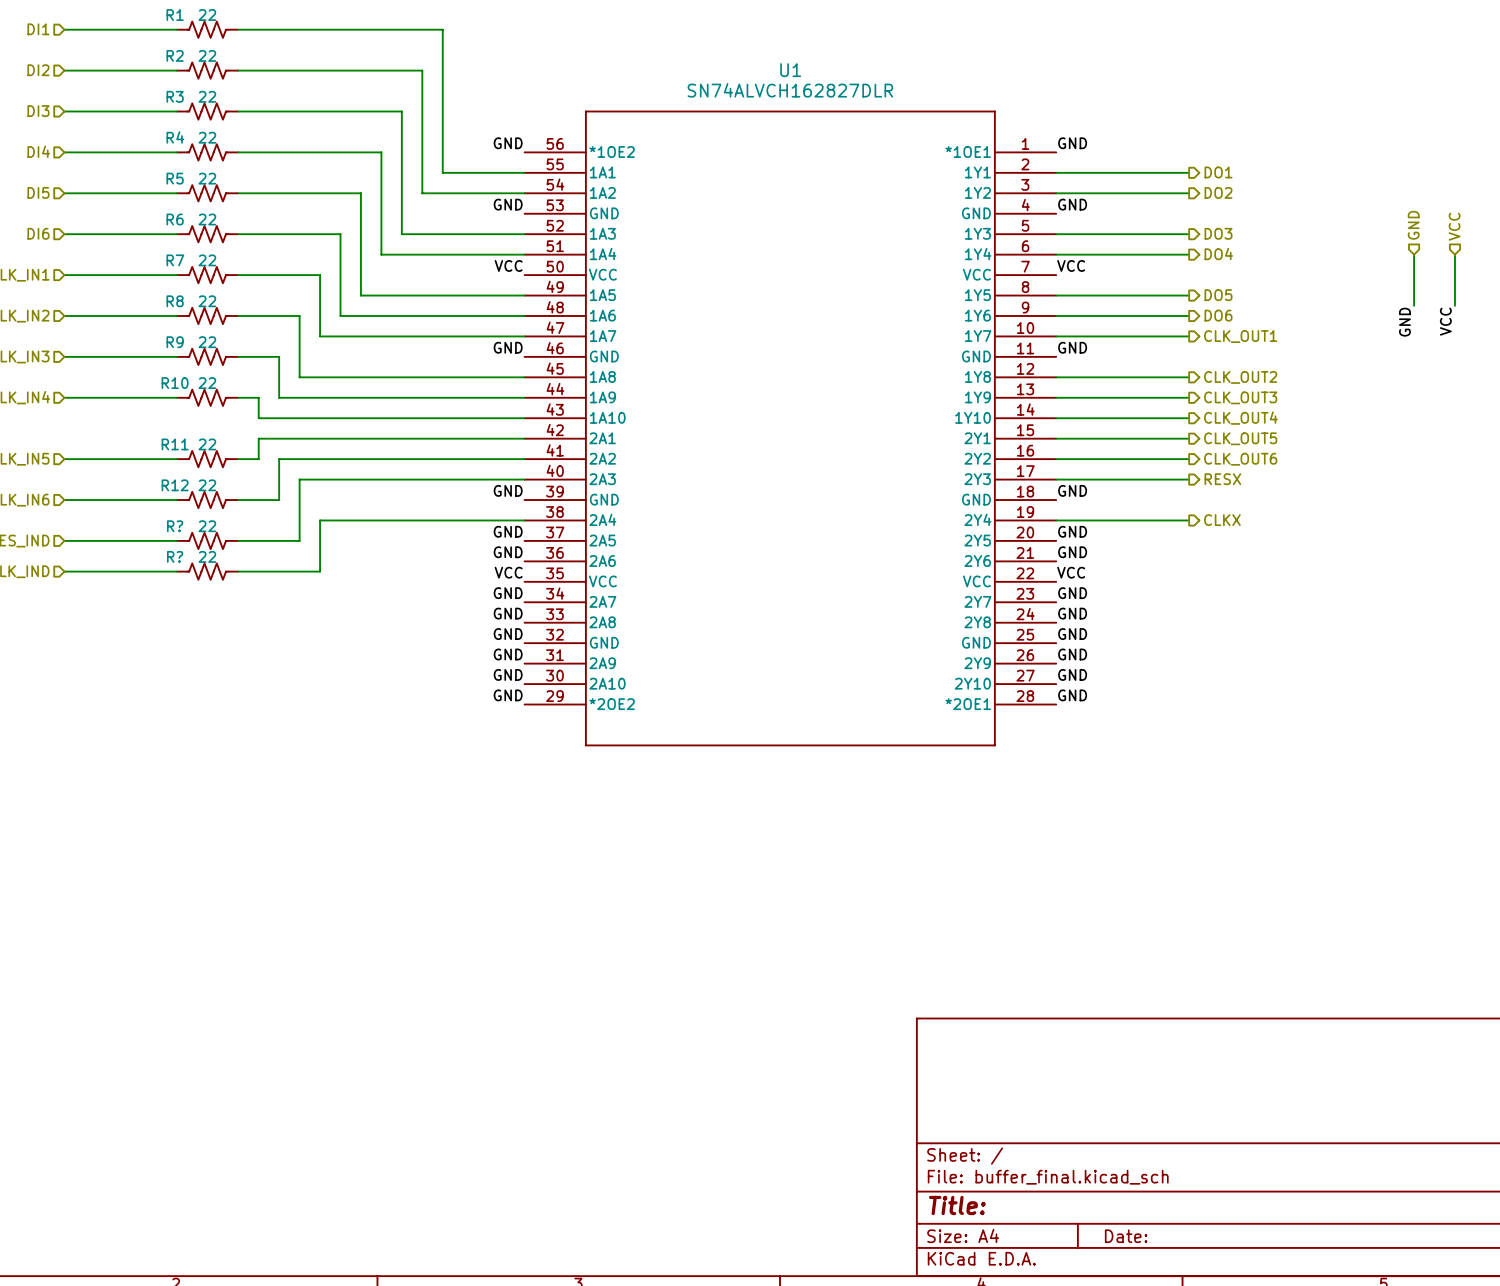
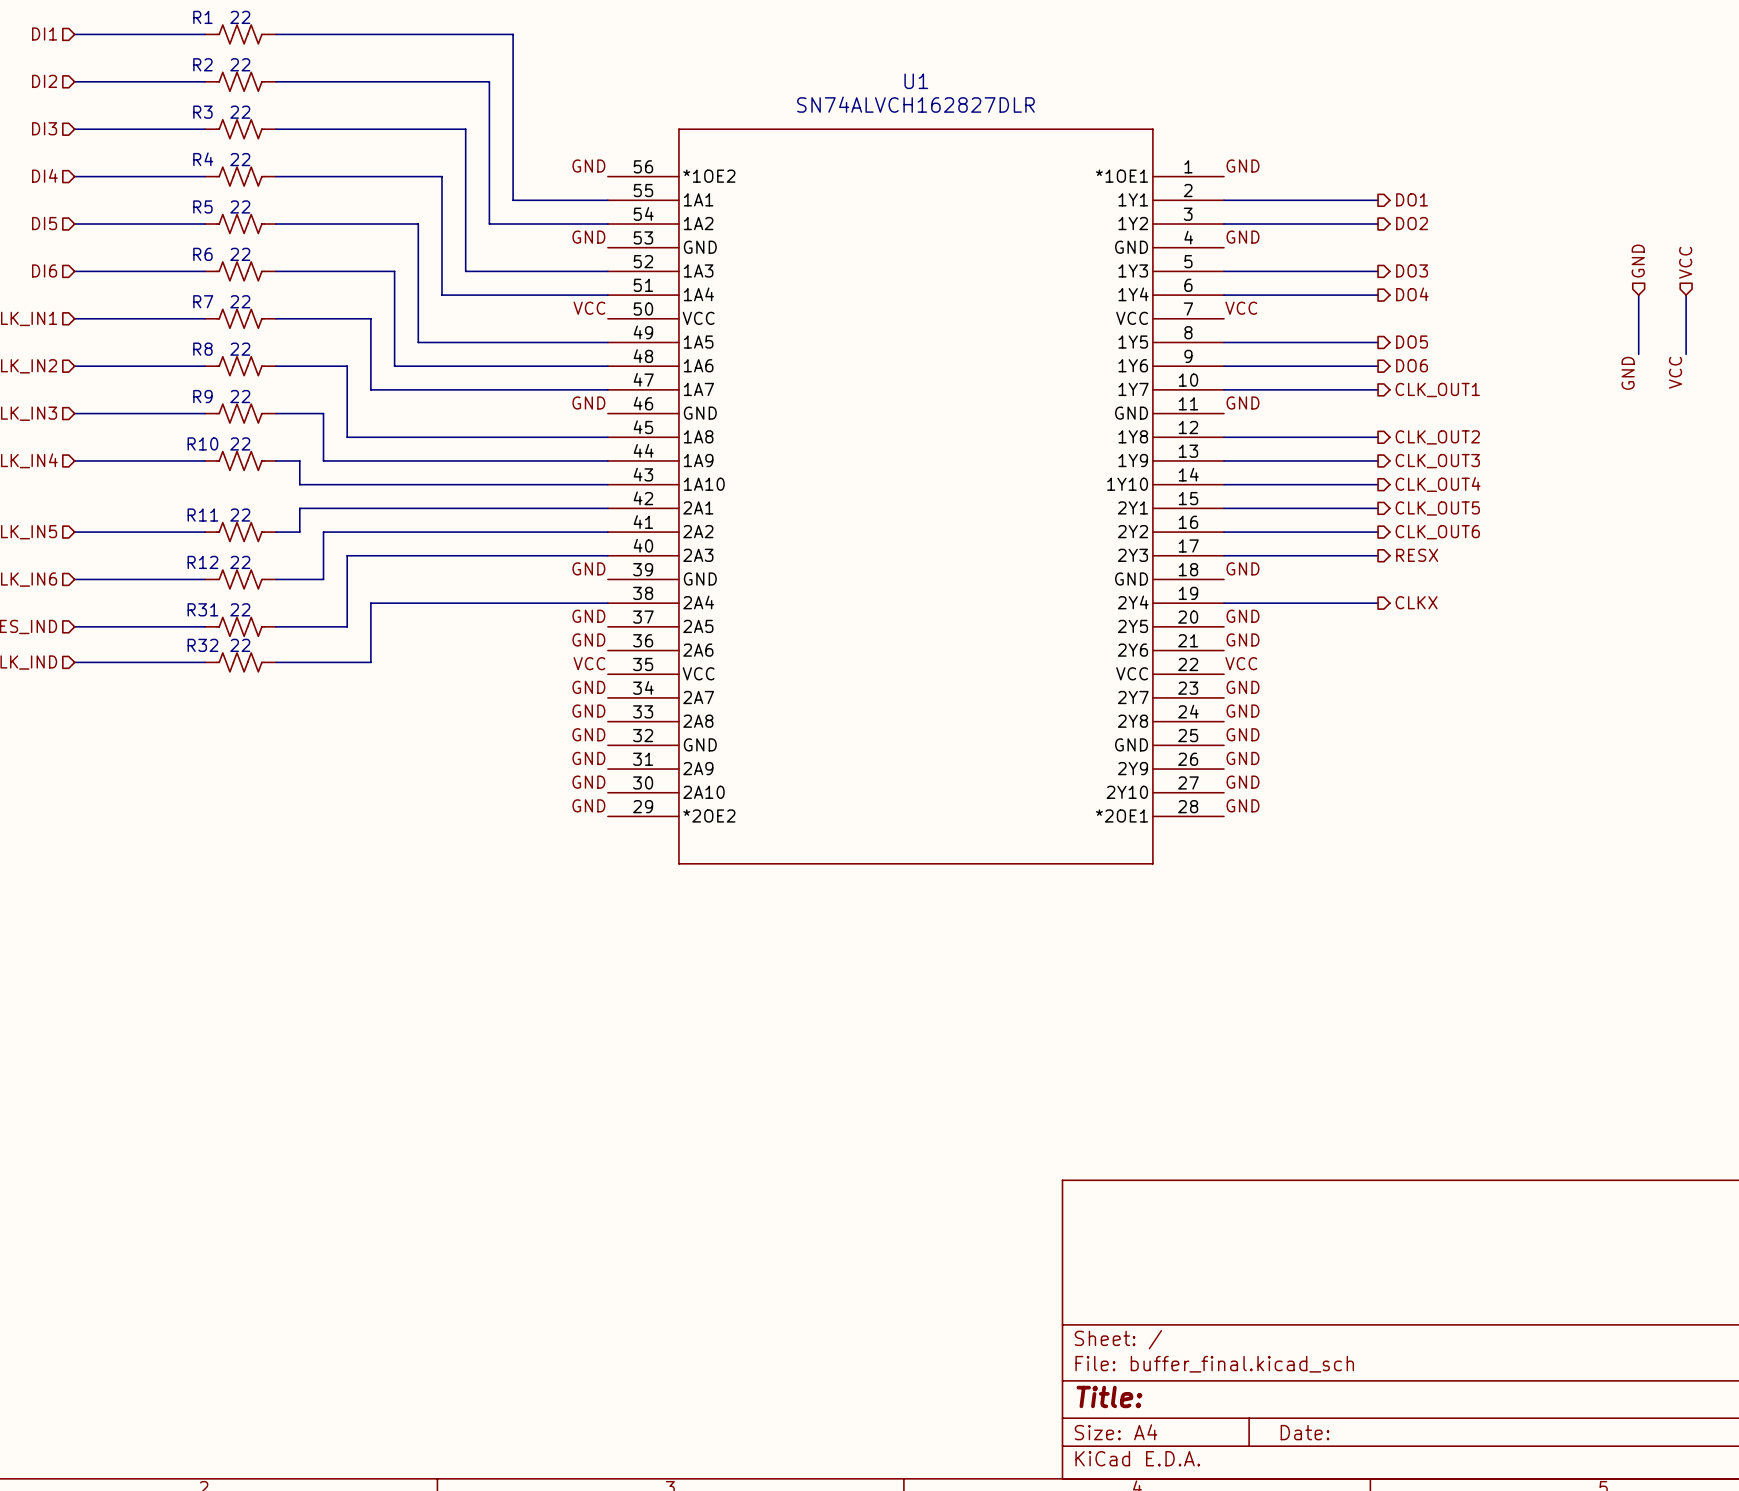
R? name: R? (175, 526) -> R31 (202, 609)
R? name: R? (175, 556) -> R32 (202, 645)

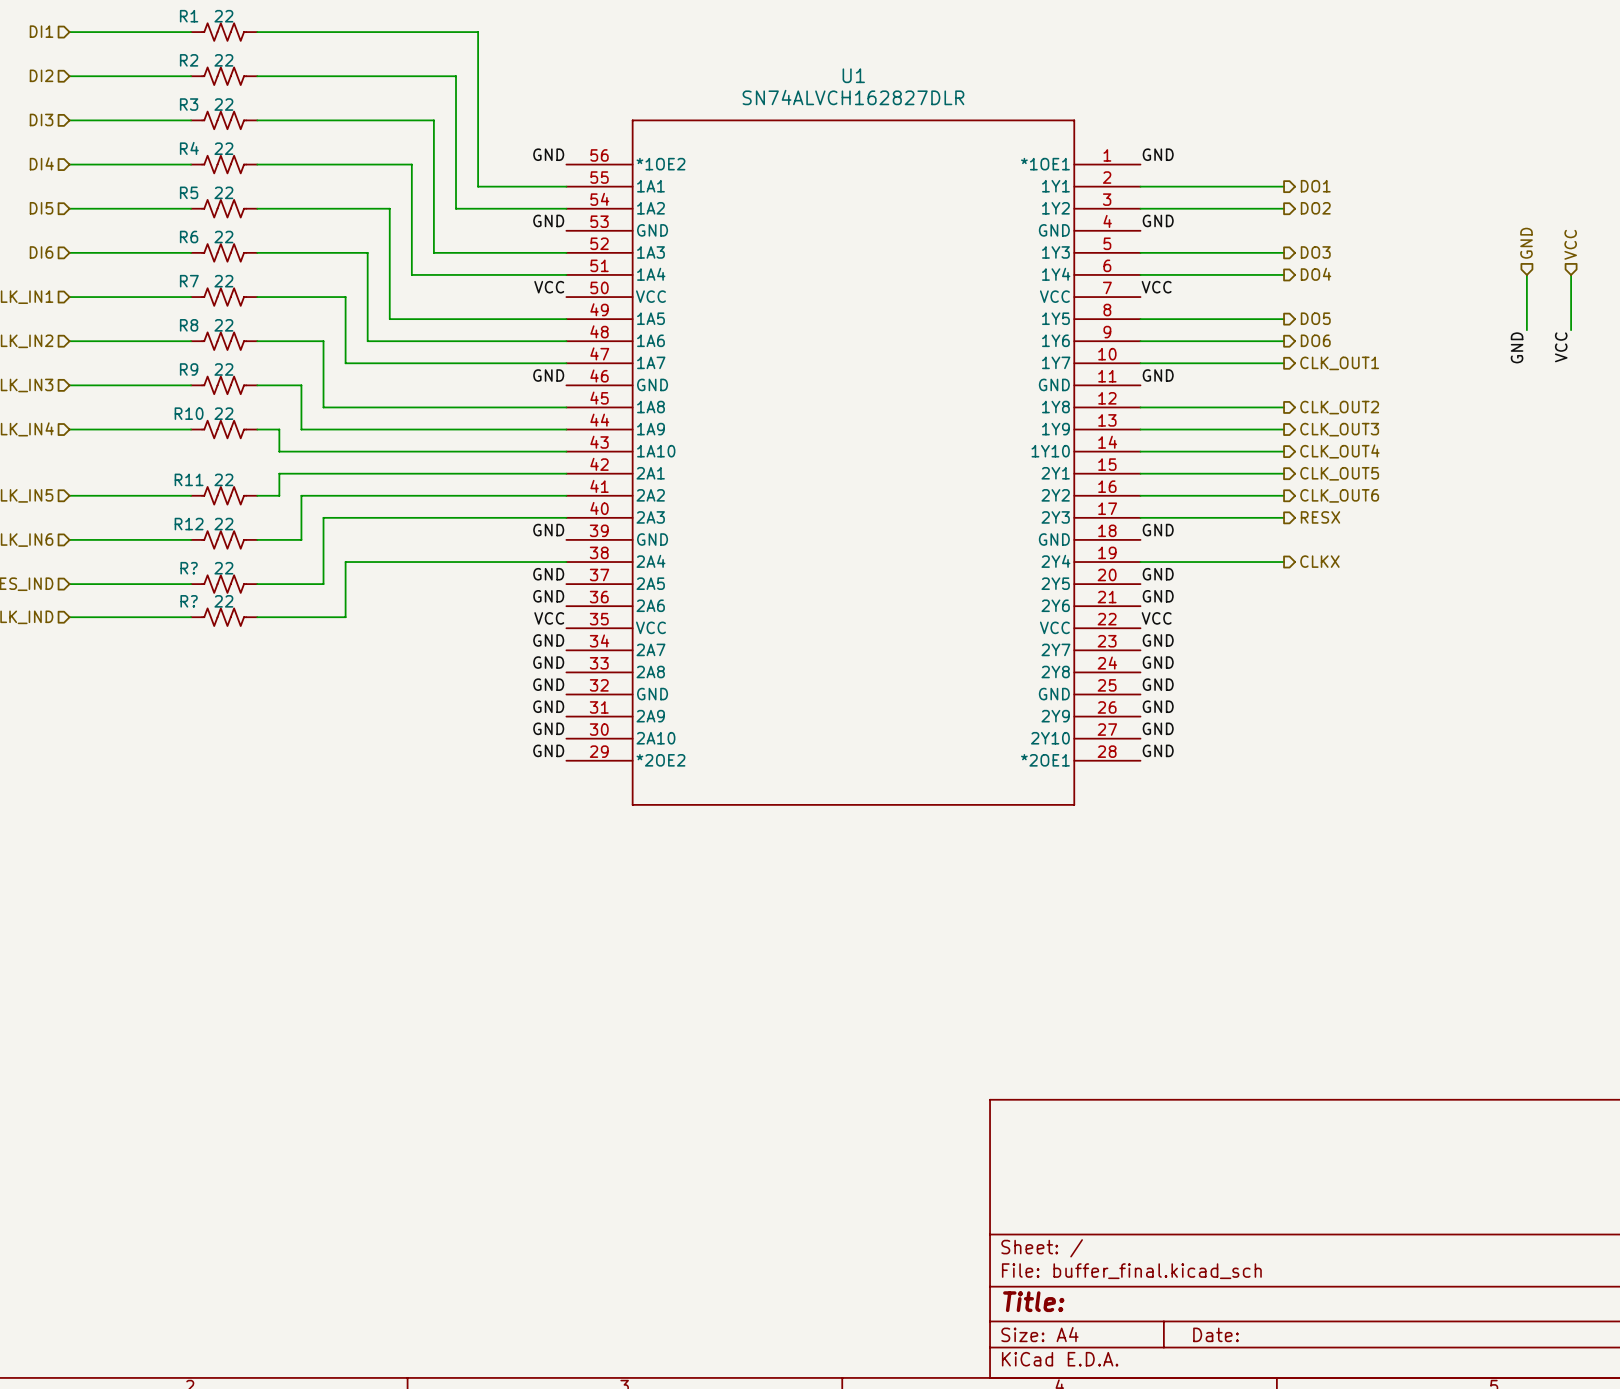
R31 name: R31 (202, 609) -> R? (189, 568)
R32 name: R32 (202, 645) -> R? (189, 601)

